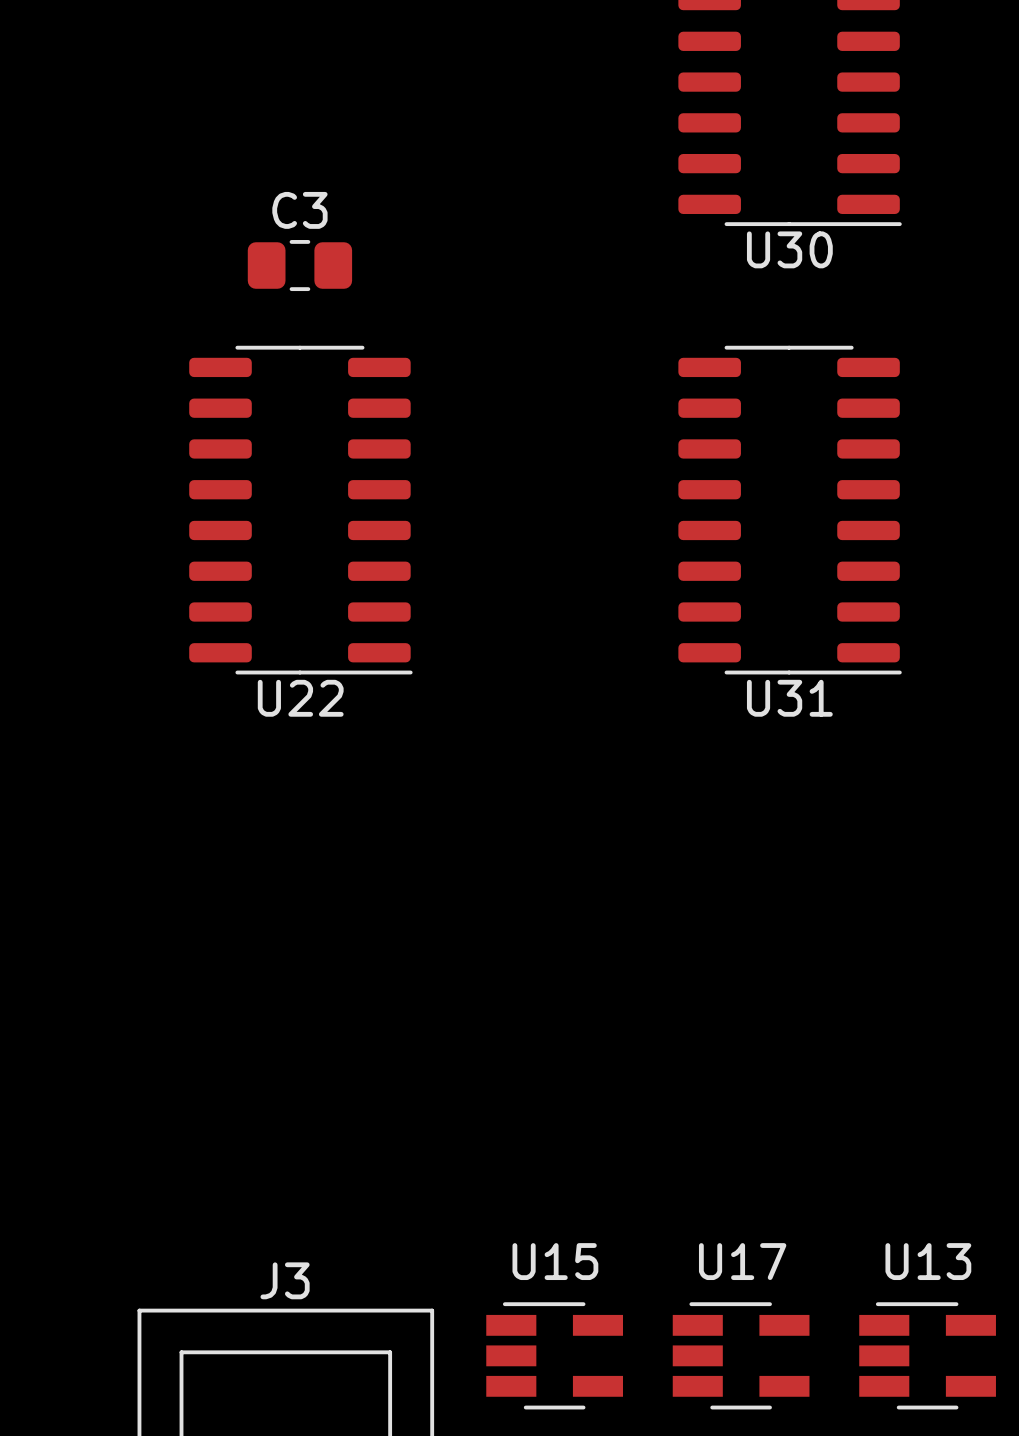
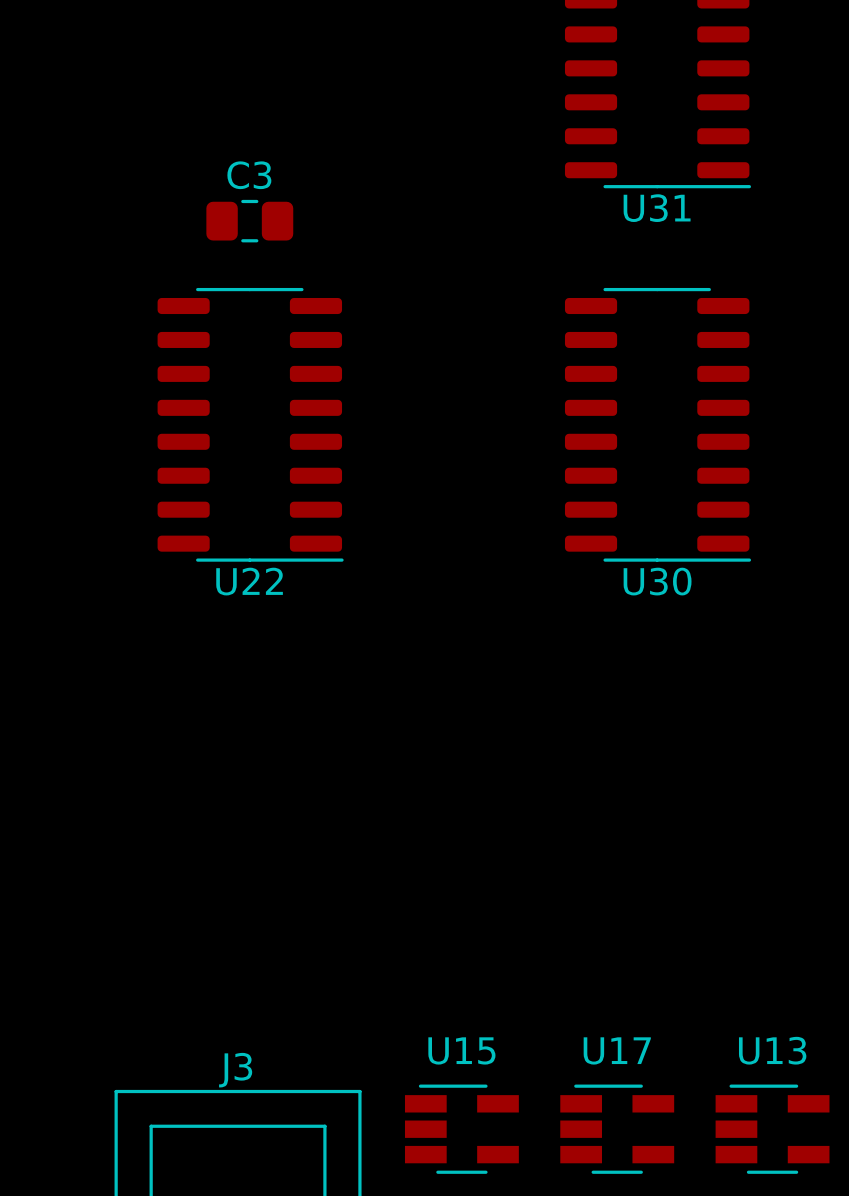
U30 name: U30 (789, 249) -> U31 (657, 208)
U31 name: U31 (789, 698) -> U30 (657, 581)

